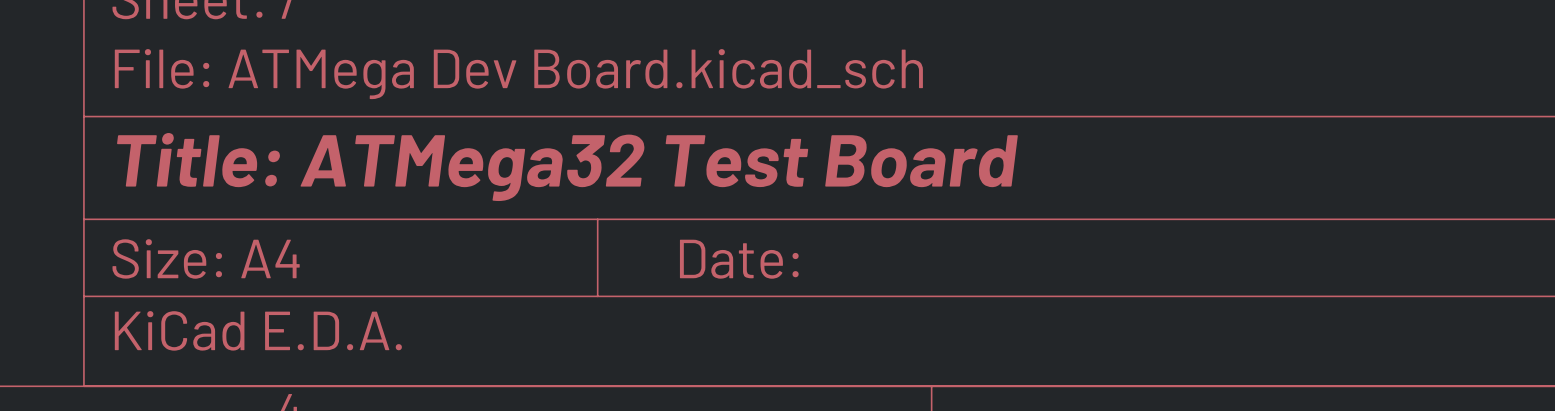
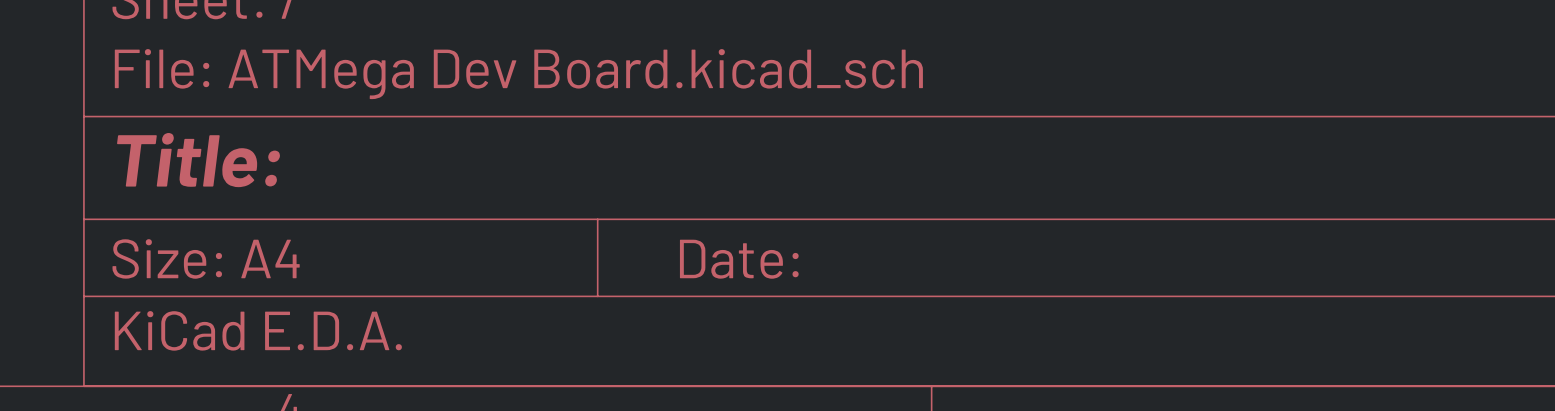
title block: Title: ATMega32 Test Board (567, 167) -> Title: (198, 160)

